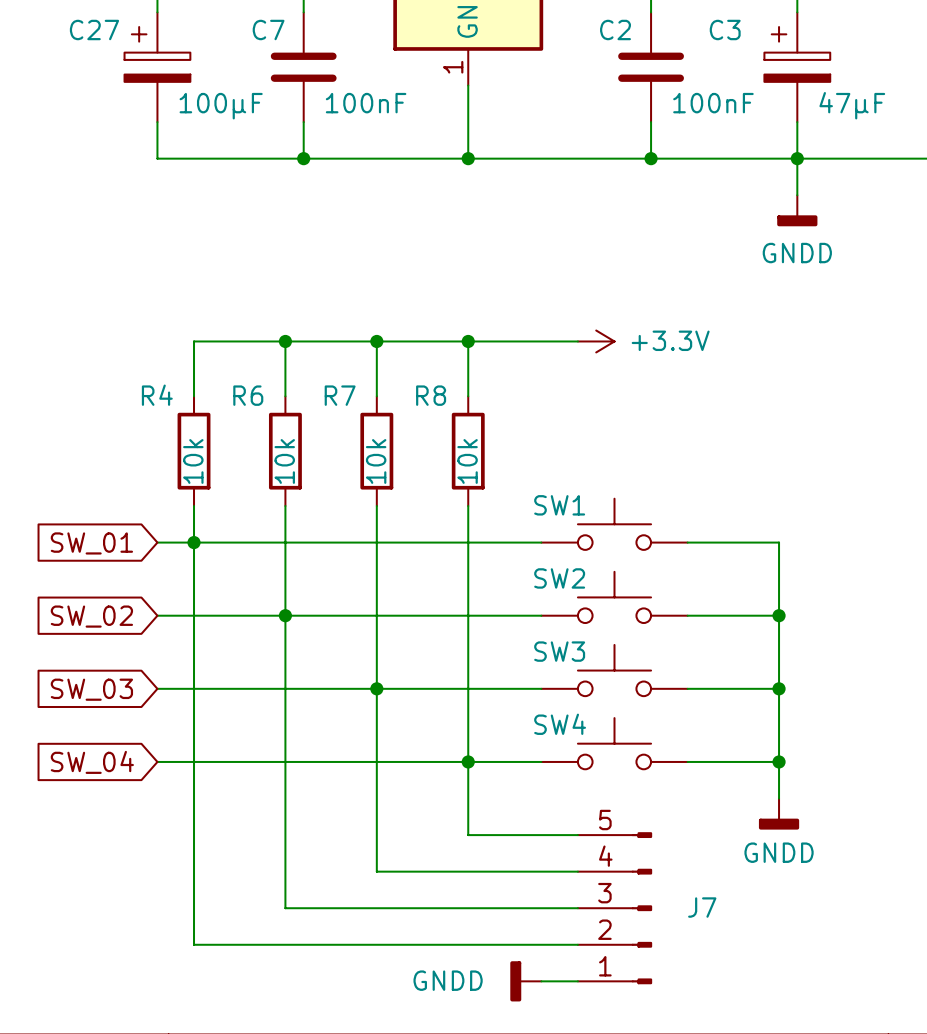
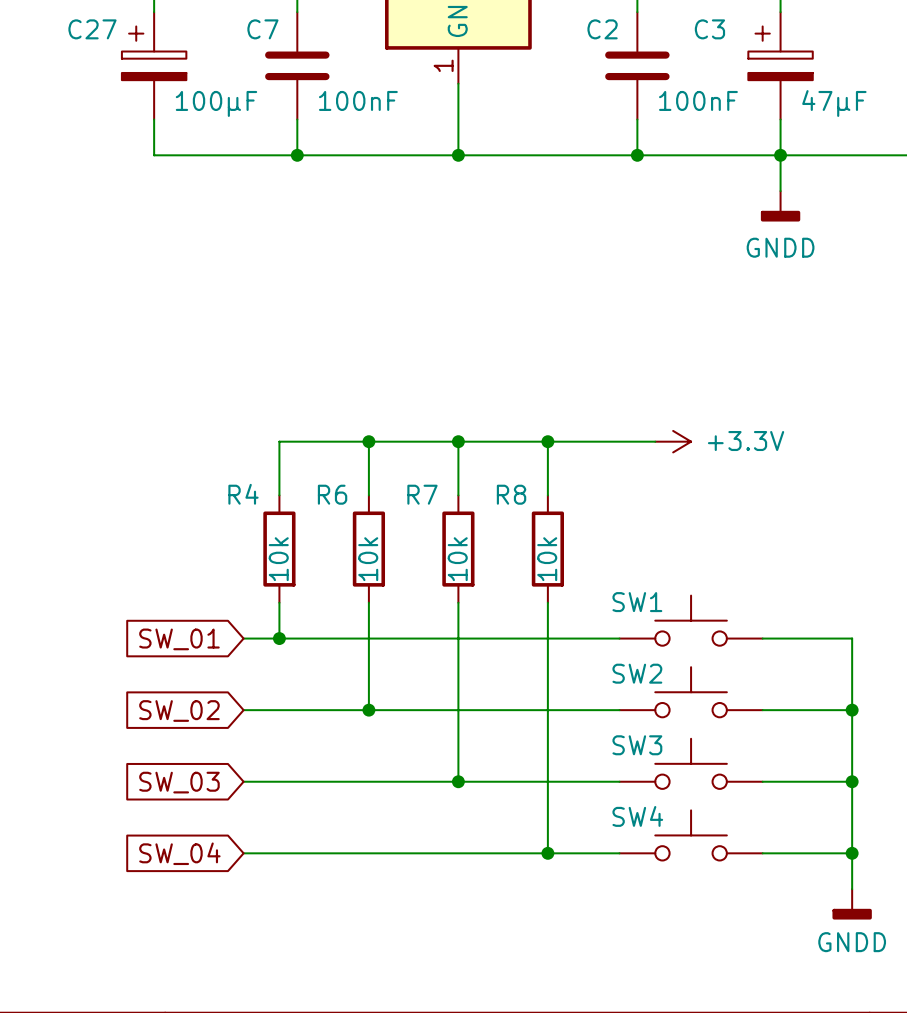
wire: (285, 341) (285, 396) -> none
junction: (285, 341) -> none
wire: (376, 341) (376, 396) -> none
junction: (376, 341) -> none
wire: (468, 341) (468, 396) -> (547, 441) (547, 495)
junction: (468, 341) -> none
wire: (577, 341) (194, 341) (194, 396) -> none
power symbol position: +3.3V (596, 341) -> +3.3V (673, 441)
R4 position: (194, 451) -> (279, 549)
R6 position: (285, 451) -> (368, 549)
junction: none -> (368, 441)
R7 position: (376, 451) -> (458, 549)
junction: none -> (458, 441)
R8 position: (468, 451) -> (547, 549)
junction: none -> (547, 441)
wire: (194, 506) (194, 944) (577, 944) -> none
wire: (285, 506) (285, 615) -> (279, 495) (279, 441) (655, 441)
wire: (376, 506) (376, 615) -> (368, 495) (368, 441)
wire: (468, 506) (468, 615) -> (458, 495) (458, 441)
SW1 position: (614, 524) -> (691, 620)
wire: (157, 542) (541, 542) -> (243, 638) (619, 638)
junction: (194, 542) -> none
wire: (687, 542) (779, 542) (779, 798) -> (852, 781) (762, 781)
global label position: SW_01 (91, 543) -> SW_01 (179, 639)
SW2 position: (614, 597) -> (691, 692)
wire: (157, 615) (541, 615) -> (243, 710) (619, 710)
junction position: (285, 615) -> (279, 638)
wire: none -> (547, 602) (547, 853)
wire: (687, 615) (779, 615) -> (762, 710) (852, 710)
junction: (779, 615) -> none
global label position: SW_02 (91, 616) -> SW_02 (179, 711)
wire: (285, 652) (285, 908) (577, 908) -> none
wire: none -> (762, 638) (852, 638) (852, 889)
SW3 position: (614, 670) -> (691, 763)
wire: (157, 688) (541, 688) -> (243, 781) (619, 781)
junction position: (376, 688) -> (368, 710)
wire: (687, 688) (779, 688) -> none
junction: (779, 688) -> none
global label position: SW_03 (91, 689) -> SW_03 (179, 782)
wire: (376, 725) (376, 871) -> (243, 853) (368, 853)
junction: none -> (852, 710)
SW4 position: (614, 743) -> (691, 835)
wire: (157, 761) (541, 761) -> none
junction position: (468, 761) -> (458, 781)
wire: (687, 761) (779, 761) -> (762, 853) (852, 853)
junction: (779, 761) -> none
global label position: SW_04 (92, 762) -> SW_04 (179, 853)
wire: (468, 798) (468, 835) (577, 835) -> none
junction: none -> (852, 781)
power symbol position: GNDD (779, 814) -> GNDD (852, 904)
junction: none -> (547, 853)
junction: none -> (852, 853)
J7: (615, 908) -> none
power symbol: GNDD (525, 981) -> none
wire: (541, 981) (577, 981) -> none

